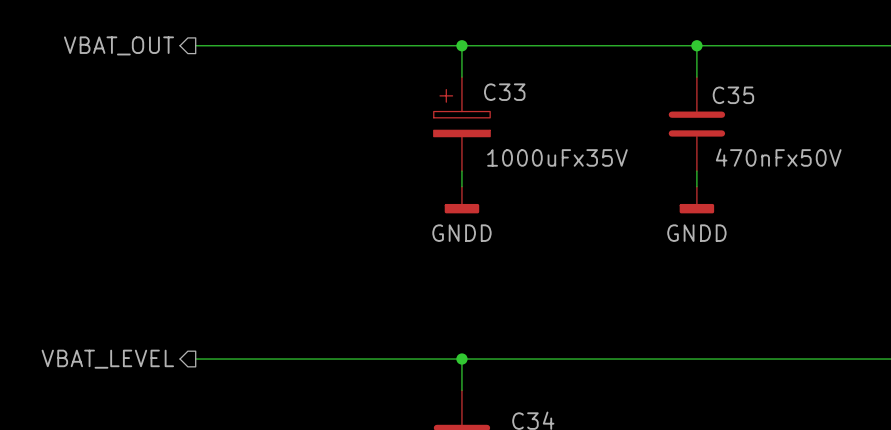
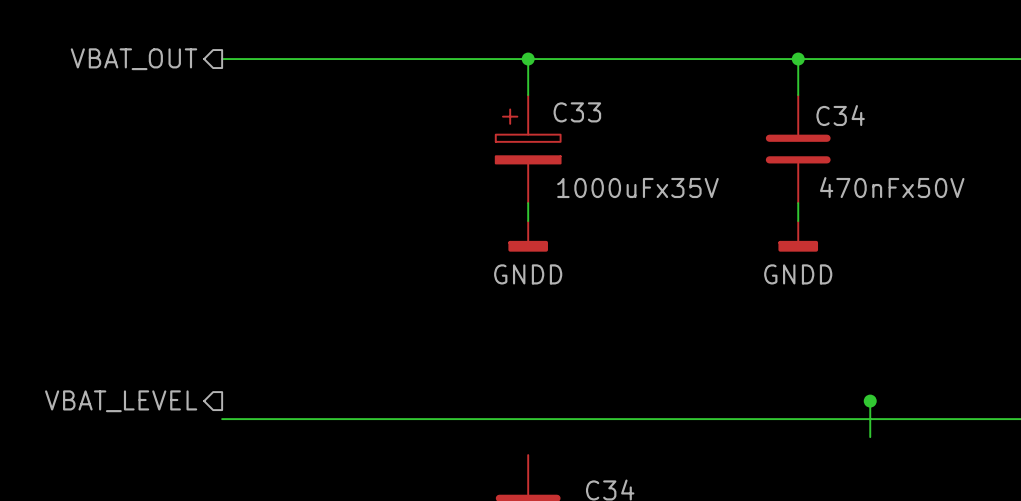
C35 name: C35 (733, 95) -> C34 (840, 115)
junction: none -> (870, 401)
hierarchical label position: VBAT_LEVEL (107, 359) -> VBAT_LEVEL (121, 401)
wire: (461, 359) (461, 390) -> (870, 401) (870, 437)
junction: (461, 359) -> none

